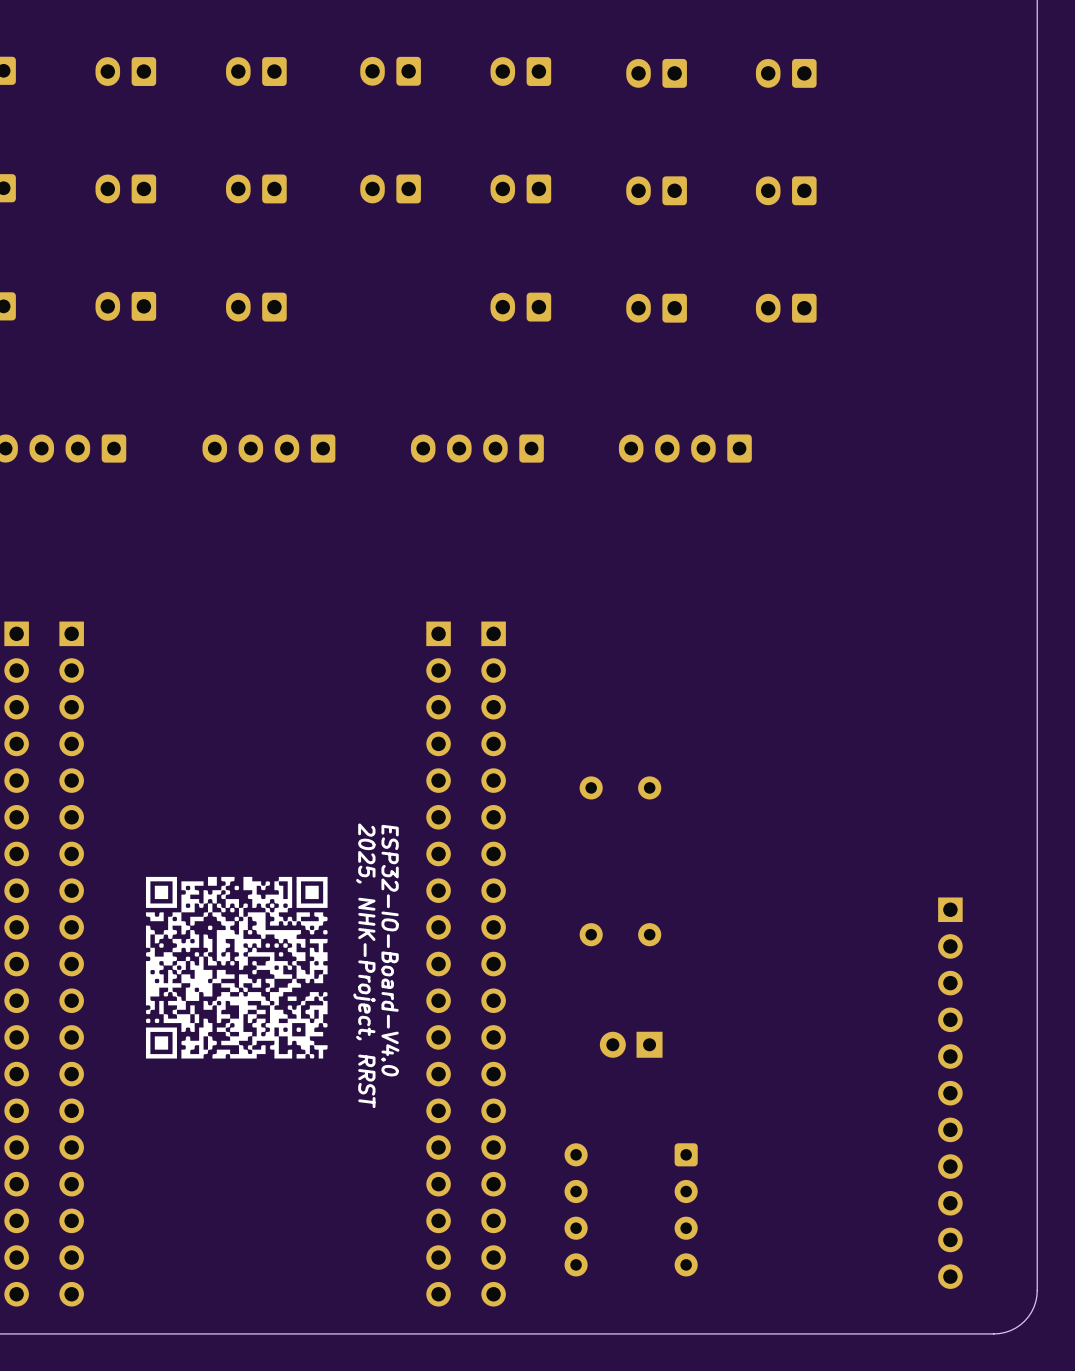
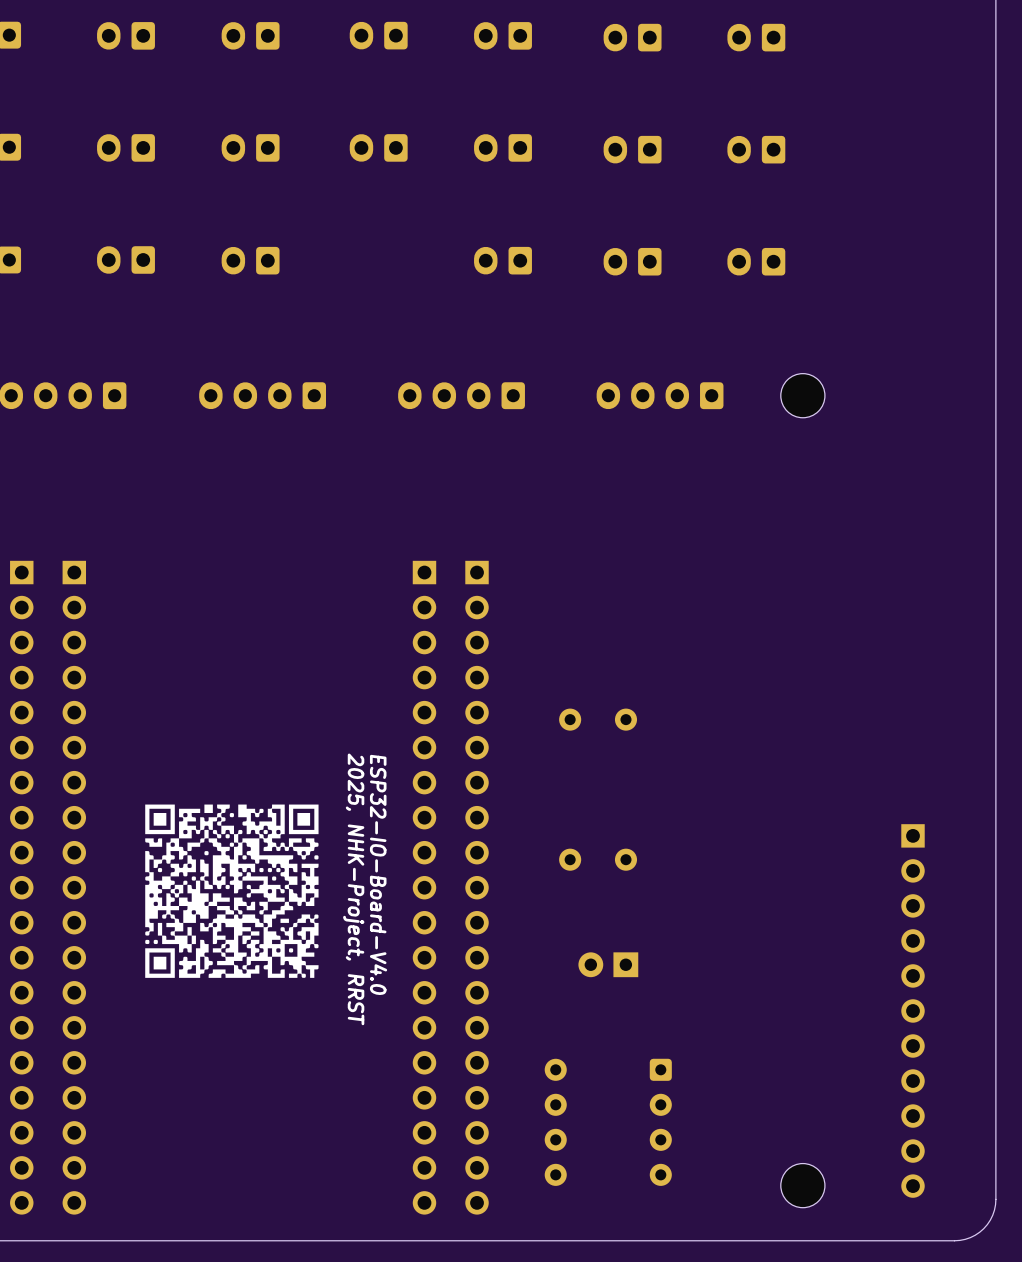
part: none -> (802, 395)
part: none -> (802, 1185)

